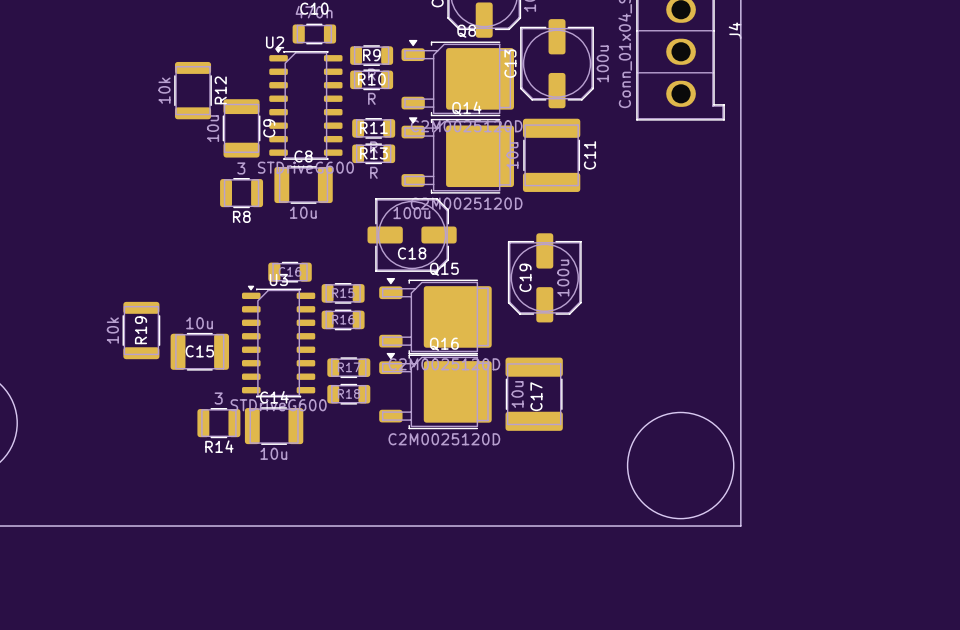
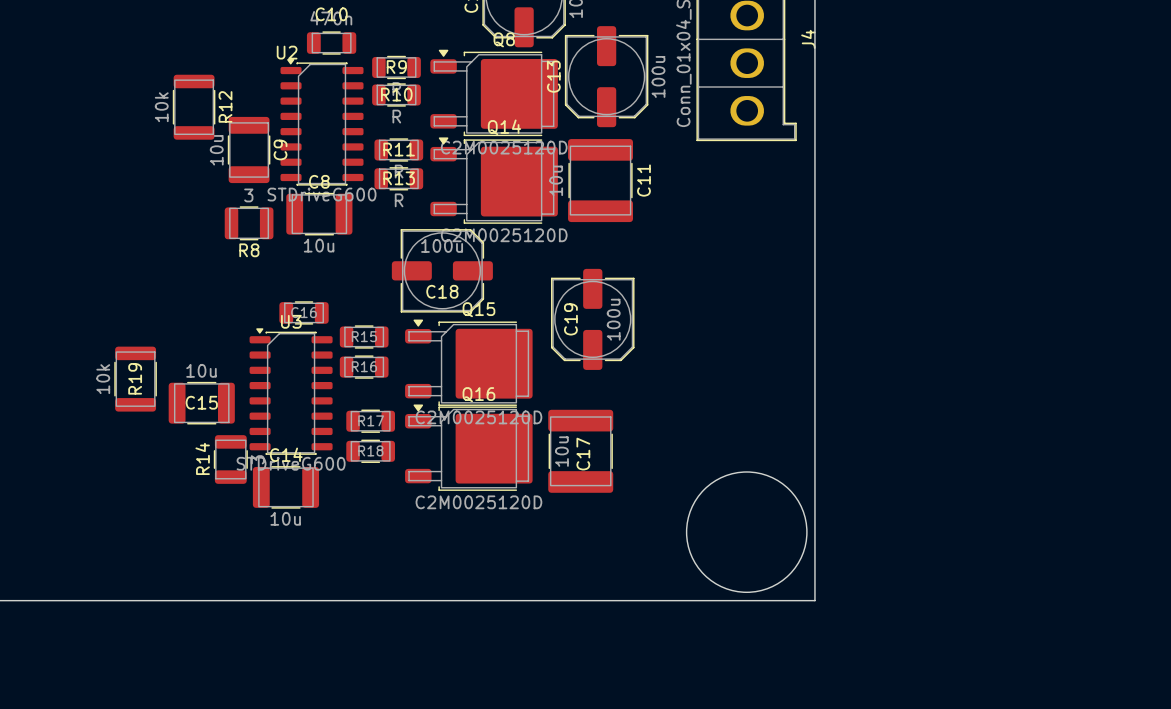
R14 rotation: 0° (218, 423) -> 90° clockwise (230, 459)

